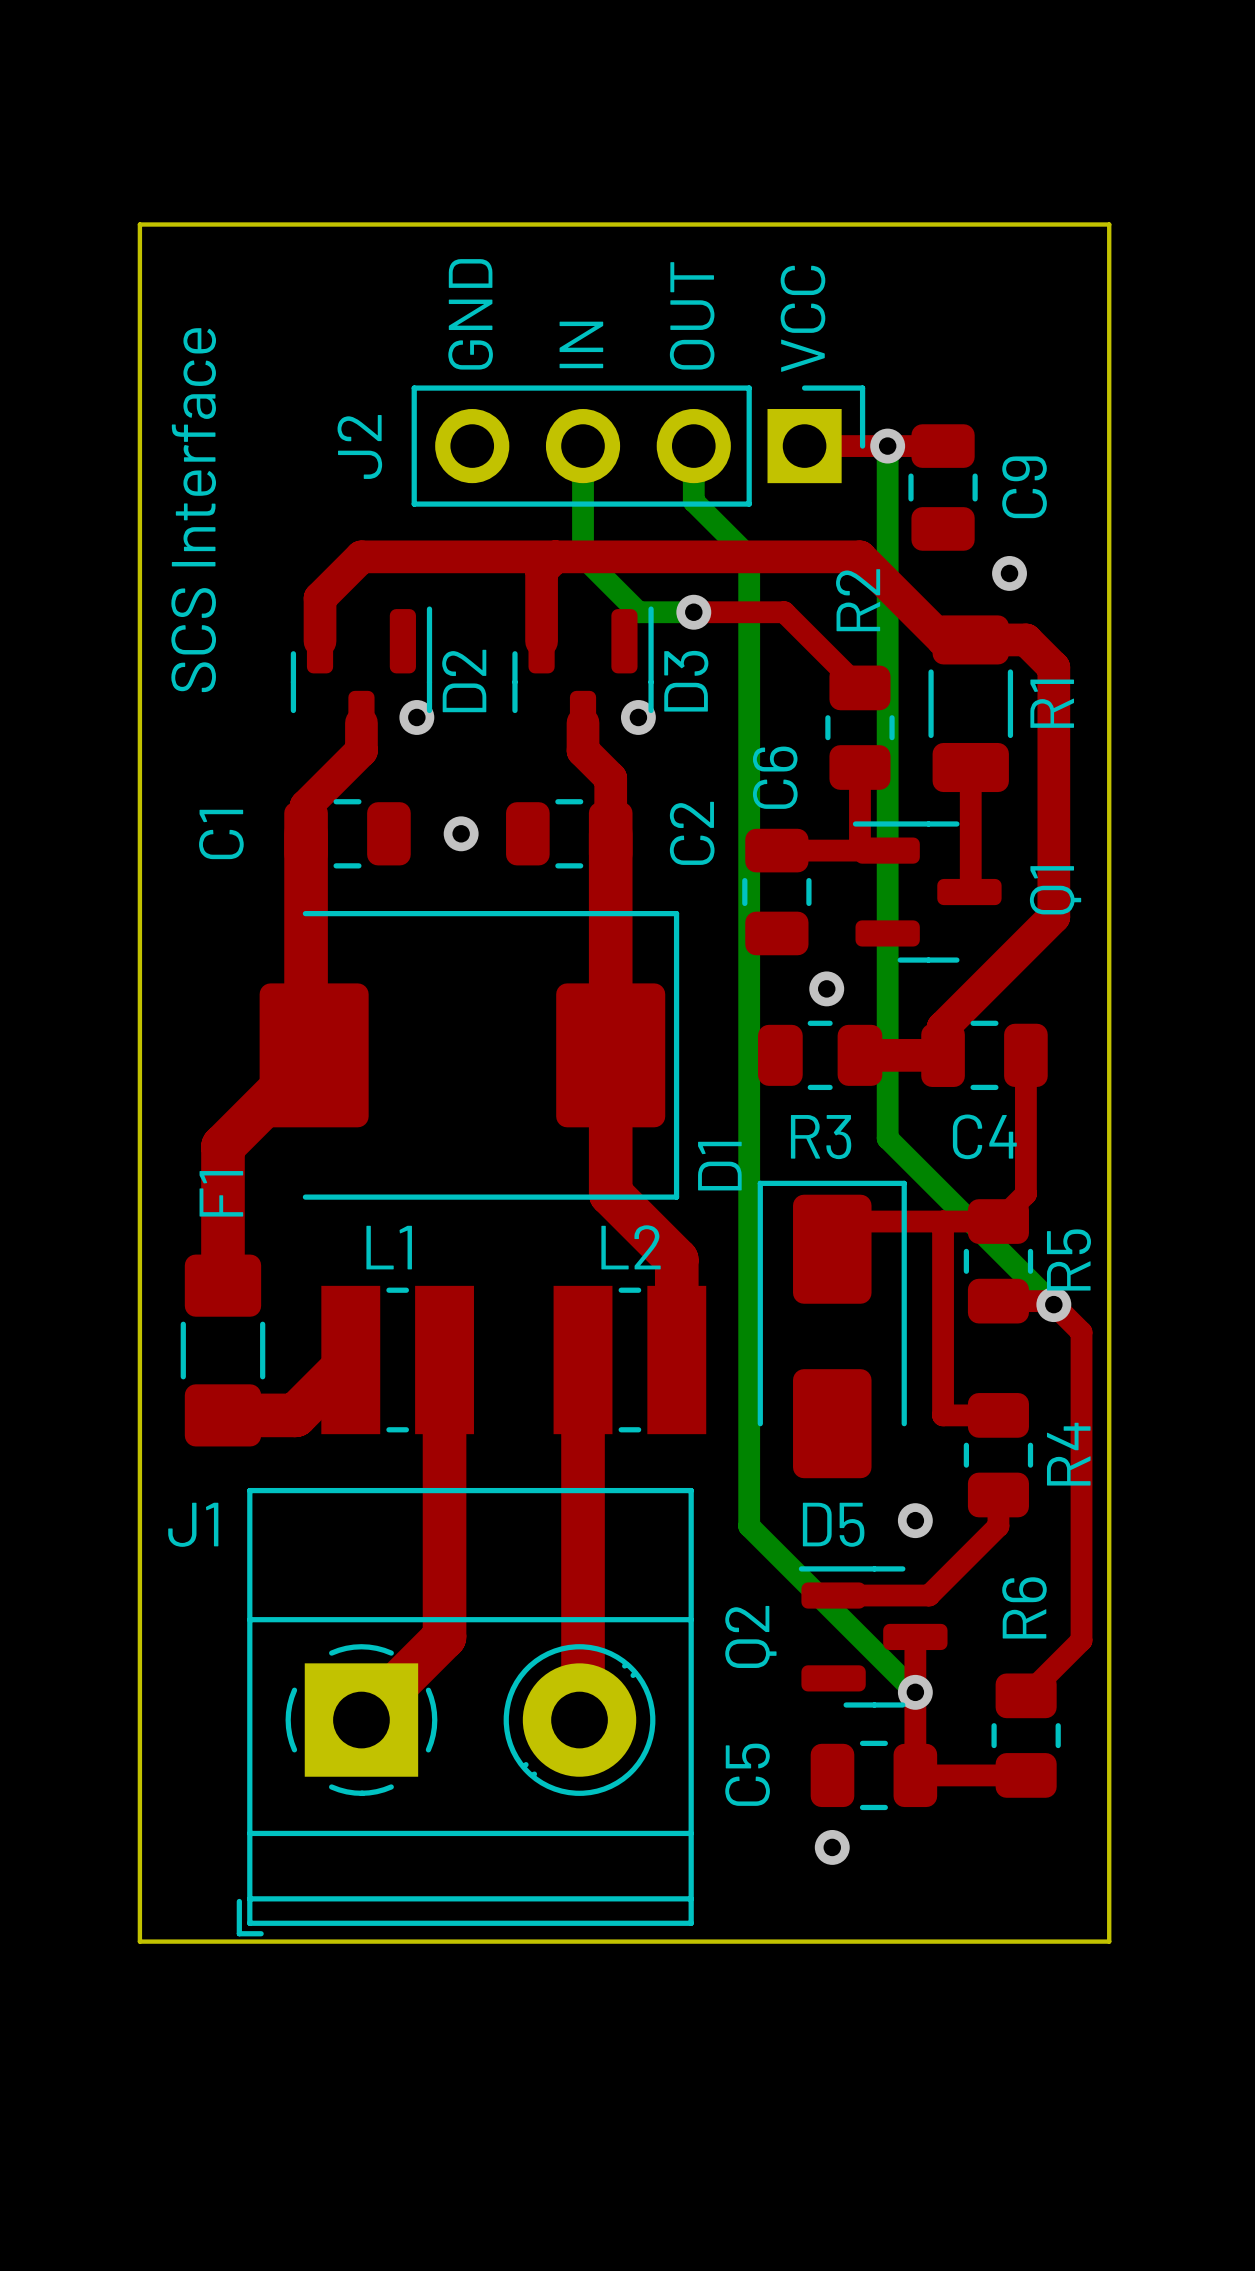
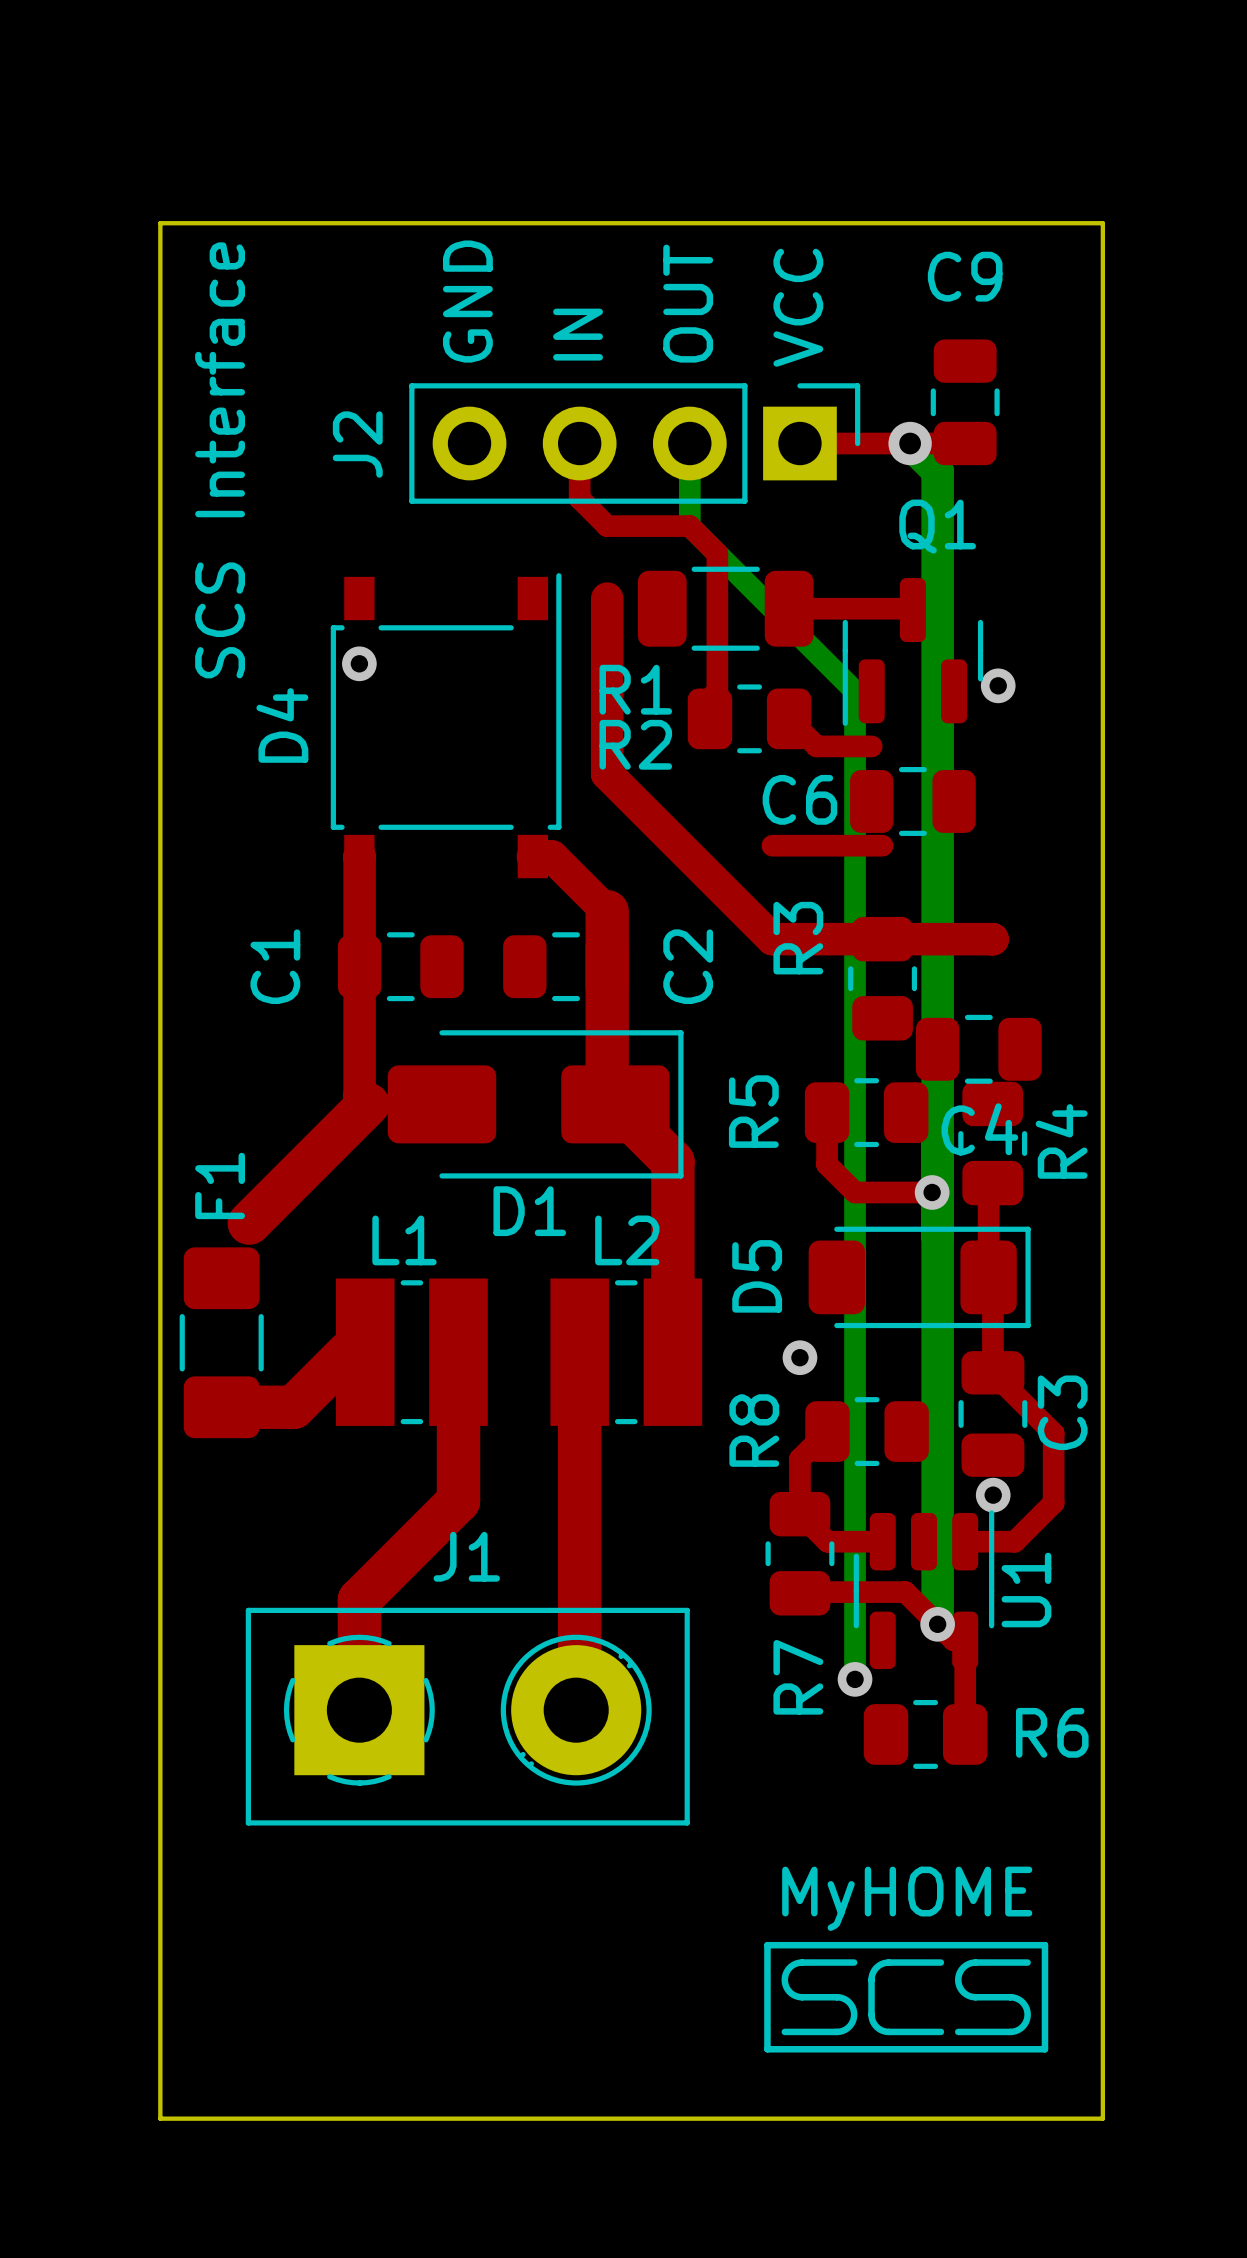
board edge: (161, 224) (139, 224) (139, 1941) (1109, 1941) -> (160, 223) (160, 2118) (1102, 2118) (1102, 1930)
top track: none -> (579, 443) (579, 498) (607, 526) (689, 526) (717, 553) (717, 691) (709, 698) (709, 718)
bottom track: (583, 446) (583, 556) (638, 612) (693, 612) -> none
bottom track: (887, 446) (887, 1138) (1053, 1304) -> none
via position: (887, 446) -> (910, 443)
bottom track: none -> (910, 443) (937, 471) (937, 1624)
C9 position: (943, 487) -> (965, 402)
C9 name rotation: 0° (1024, 487) -> 90° clockwise (965, 276)
C9 name position: C9 (1024, 487) -> C9 (965, 276)
bottom track: (693, 501) (749, 556) (749, 1526) (915, 1692) -> (689, 498) (689, 526) (855, 691) (855, 1679)
text position: SCS Interface (193, 510) -> SCS Interface (220, 460)
top track: (555, 556) (541, 570) (541, 641) -> none
via position: (1009, 573) -> (998, 685)
R2 name position: R2 (858, 600) -> R2 (635, 744)
top track: none -> (607, 598) (607, 773) (772, 939) (992, 939)
top track: (693, 612) (784, 612) (859, 687) -> none
via: (693, 612) -> none
top track: none -> (789, 608) (912, 610)
top track: (320, 641) (320, 598) (361, 556) (859, 556) (943, 639) (1026, 639) (1053, 667) (1053, 916) (943, 1027) (943, 1055) (859, 1055) -> none
D2: (361, 680) -> none
D3: (583, 680) -> none
R1 rotation: 0° (970, 703) -> 90° clockwise (725, 608)
R1 position: (970, 703) -> (725, 608)
R1 name position: R1 (1052, 703) -> R1 (635, 689)
via position: (416, 717) -> (359, 663)
via: (638, 717) -> none
top track: (361, 723) (361, 750) (306, 806) (306, 1047) (314, 1055) (222, 1146) (222, 1285) -> none
top track: (583, 723) (583, 750) (610, 778) (610, 916) -> (532, 856) (552, 856) (607, 911)
top track: none -> (789, 718) (816, 746) (871, 746)
R2 rotation: 0° (859, 727) -> 90° clockwise (749, 718)
R2 position: (859, 727) -> (749, 718)
D4: none -> (446, 725)
top track: (859, 767) (859, 850) -> none
top track: (970, 767) (969, 892) -> none
C6 name position: C6 (775, 777) -> C6 (799, 799)
C1 position: (347, 833) -> (400, 966)
via: (461, 833) -> none
C2 position: (569, 833) -> (566, 966)
top track: none -> (359, 856) (359, 1095) (368, 1104) (249, 1223)
C6 rotation: 0° (776, 892) -> 90° clockwise (912, 801)
C6 position: (776, 892) -> (912, 801)
Q1 rotation: 0° (927, 892) -> 90° counterclockwise (912, 651)
Q1 position: (927, 892) -> (912, 651)
D1 footprint: [259, 910, 680, 1200] -> [387, 1030, 684, 1179]
via: (826, 988) -> none
R3 rotation: 0° (820, 1055) -> 90° clockwise (882, 978)
R3 position: (820, 1055) -> (882, 978)
top track: (1025, 1055) (1025, 1194) (998, 1221) (859, 1221) (832, 1249) -> none
top track: (610, 1102) (610, 1193) (676, 1259) -> (607, 1096) (672, 1161) (672, 1252)
top track: none -> (827, 1112) (827, 1164) (855, 1192) (932, 1192)
D1 name position: D1 (719, 1166) -> D1 (529, 1211)
D5 footprint: [757, 1180, 907, 1479] -> [808, 1226, 1031, 1329]
top track: none -> (992, 1183) (988, 1187) (988, 1277) (992, 1281) (992, 1372) (1053, 1433) (1053, 1502) (1014, 1541) (965, 1541)
via: none -> (932, 1192)
top track: (943, 1221) (943, 1415) (998, 1415) -> none
R5 name position: R5 (1068, 1259) -> R5 (753, 1111)
R5 rotation: 0° (998, 1261) -> 90° clockwise (866, 1112)
R5 position: (998, 1261) -> (866, 1112)
top track: (998, 1301) (1050, 1301) (1081, 1332) (1081, 1640) (1026, 1695) -> none
via: (1053, 1304) -> none
L1 position: (397, 1360) -> (411, 1352)
top track: (444, 1360) (444, 1636) (361, 1720) -> (458, 1352) (458, 1500) (359, 1600) (359, 1710)
via: none -> (799, 1357)
C3: none -> (992, 1413)
top track: none -> (827, 1431) (799, 1459) (799, 1514) (827, 1541) (882, 1541)
R8: none -> (867, 1431)
R4 position: (998, 1455) -> (992, 1143)
J1 footprint: [236, 1487, 694, 1937] -> [245, 1607, 690, 1826]
top track: (998, 1494) (998, 1526) (929, 1595) (833, 1595) -> none
via: none -> (993, 1495)
via: (915, 1520) -> none
J1 name position: J1 (193, 1524) -> J1 (466, 1556)
D5 name position: D5 (833, 1524) -> D5 (757, 1276)
R7: none -> (799, 1553)
U1: none -> (923, 1589)
top track: none -> (799, 1593) (905, 1592) (953, 1640) (965, 1640) (965, 1734)
via: none -> (937, 1624)
Q2: (873, 1636) -> none
top track: (915, 1636) (915, 1775) (1026, 1775) -> none
via: none -> (855, 1679)
via: (915, 1692) -> none
R6 rotation: 0° (1026, 1735) -> 90° clockwise (925, 1734)
R6 position: (1026, 1735) -> (925, 1734)
C5: (873, 1775) -> none
via: (832, 1847) -> none
text: none -> MyHOME (907, 1898)
line: none -> (767, 1945) (1044, 1945) (1044, 2049) (767, 2049) (767, 1945)
line: none -> (854, 1962) (797, 1963) (789, 1968) (784, 1977) (786, 1987) (795, 1996) (838, 1997) (846, 2000) (854, 2012) (849, 2026) (838, 2031) (784, 2031)
line: none -> (940, 1962) (885, 1962) (875, 1969) (871, 1979) (871, 2016) (878, 2028) (886, 2031) (940, 2031)
line: none -> (1027, 1962) (973, 1962) (962, 1968) (958, 1981) (965, 1994) (973, 1997) (1016, 1998) (1024, 2004) (1027, 2016) (1023, 2026) (1014, 2031) (958, 2031)

